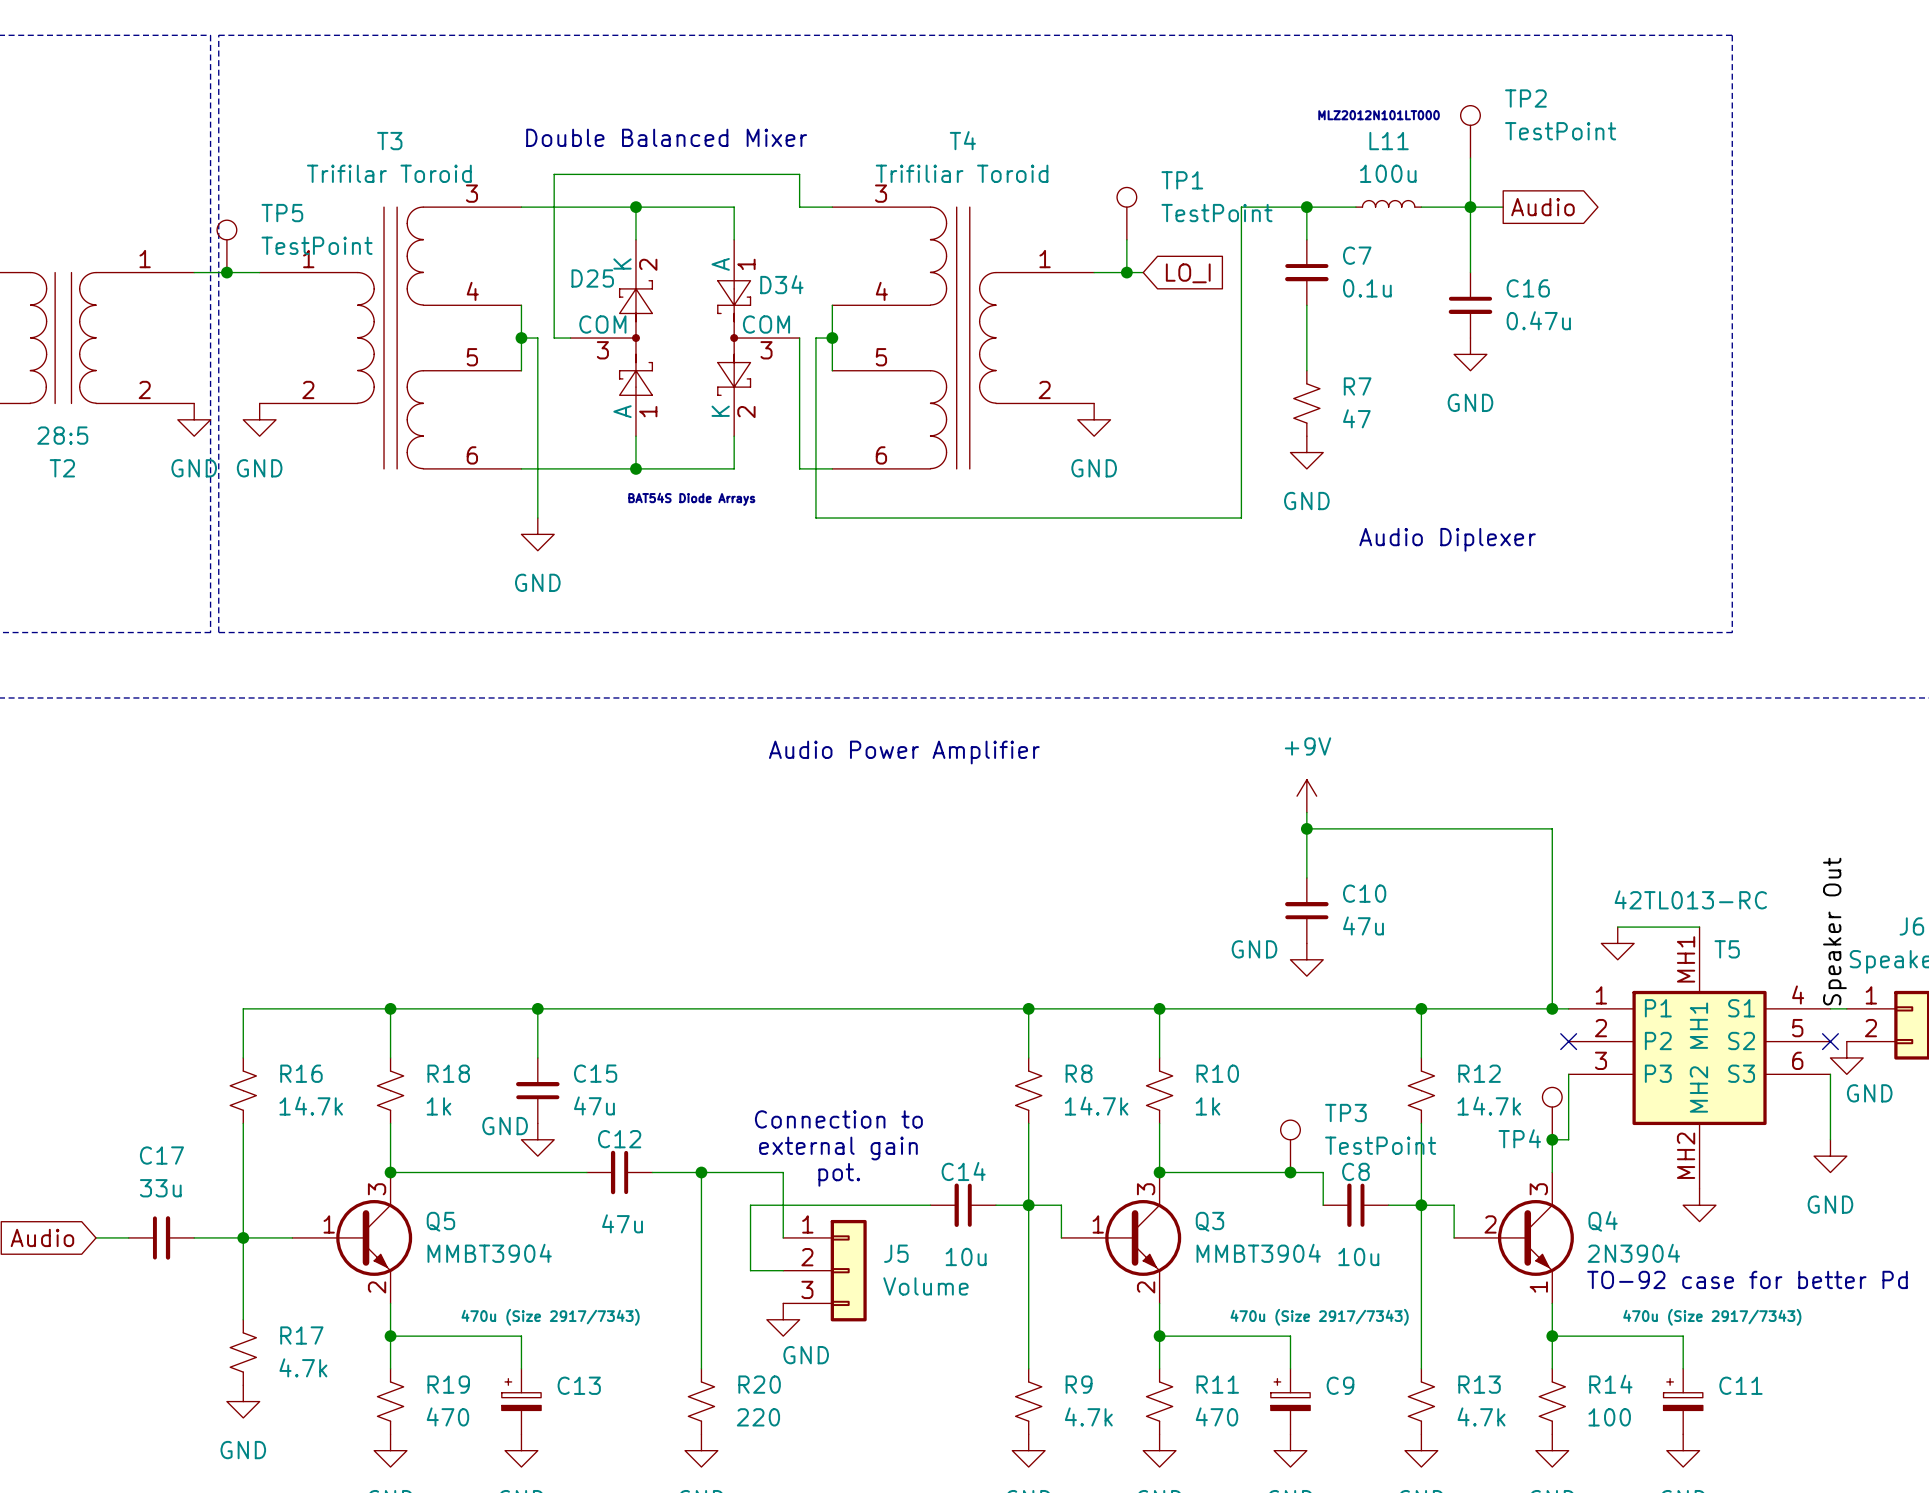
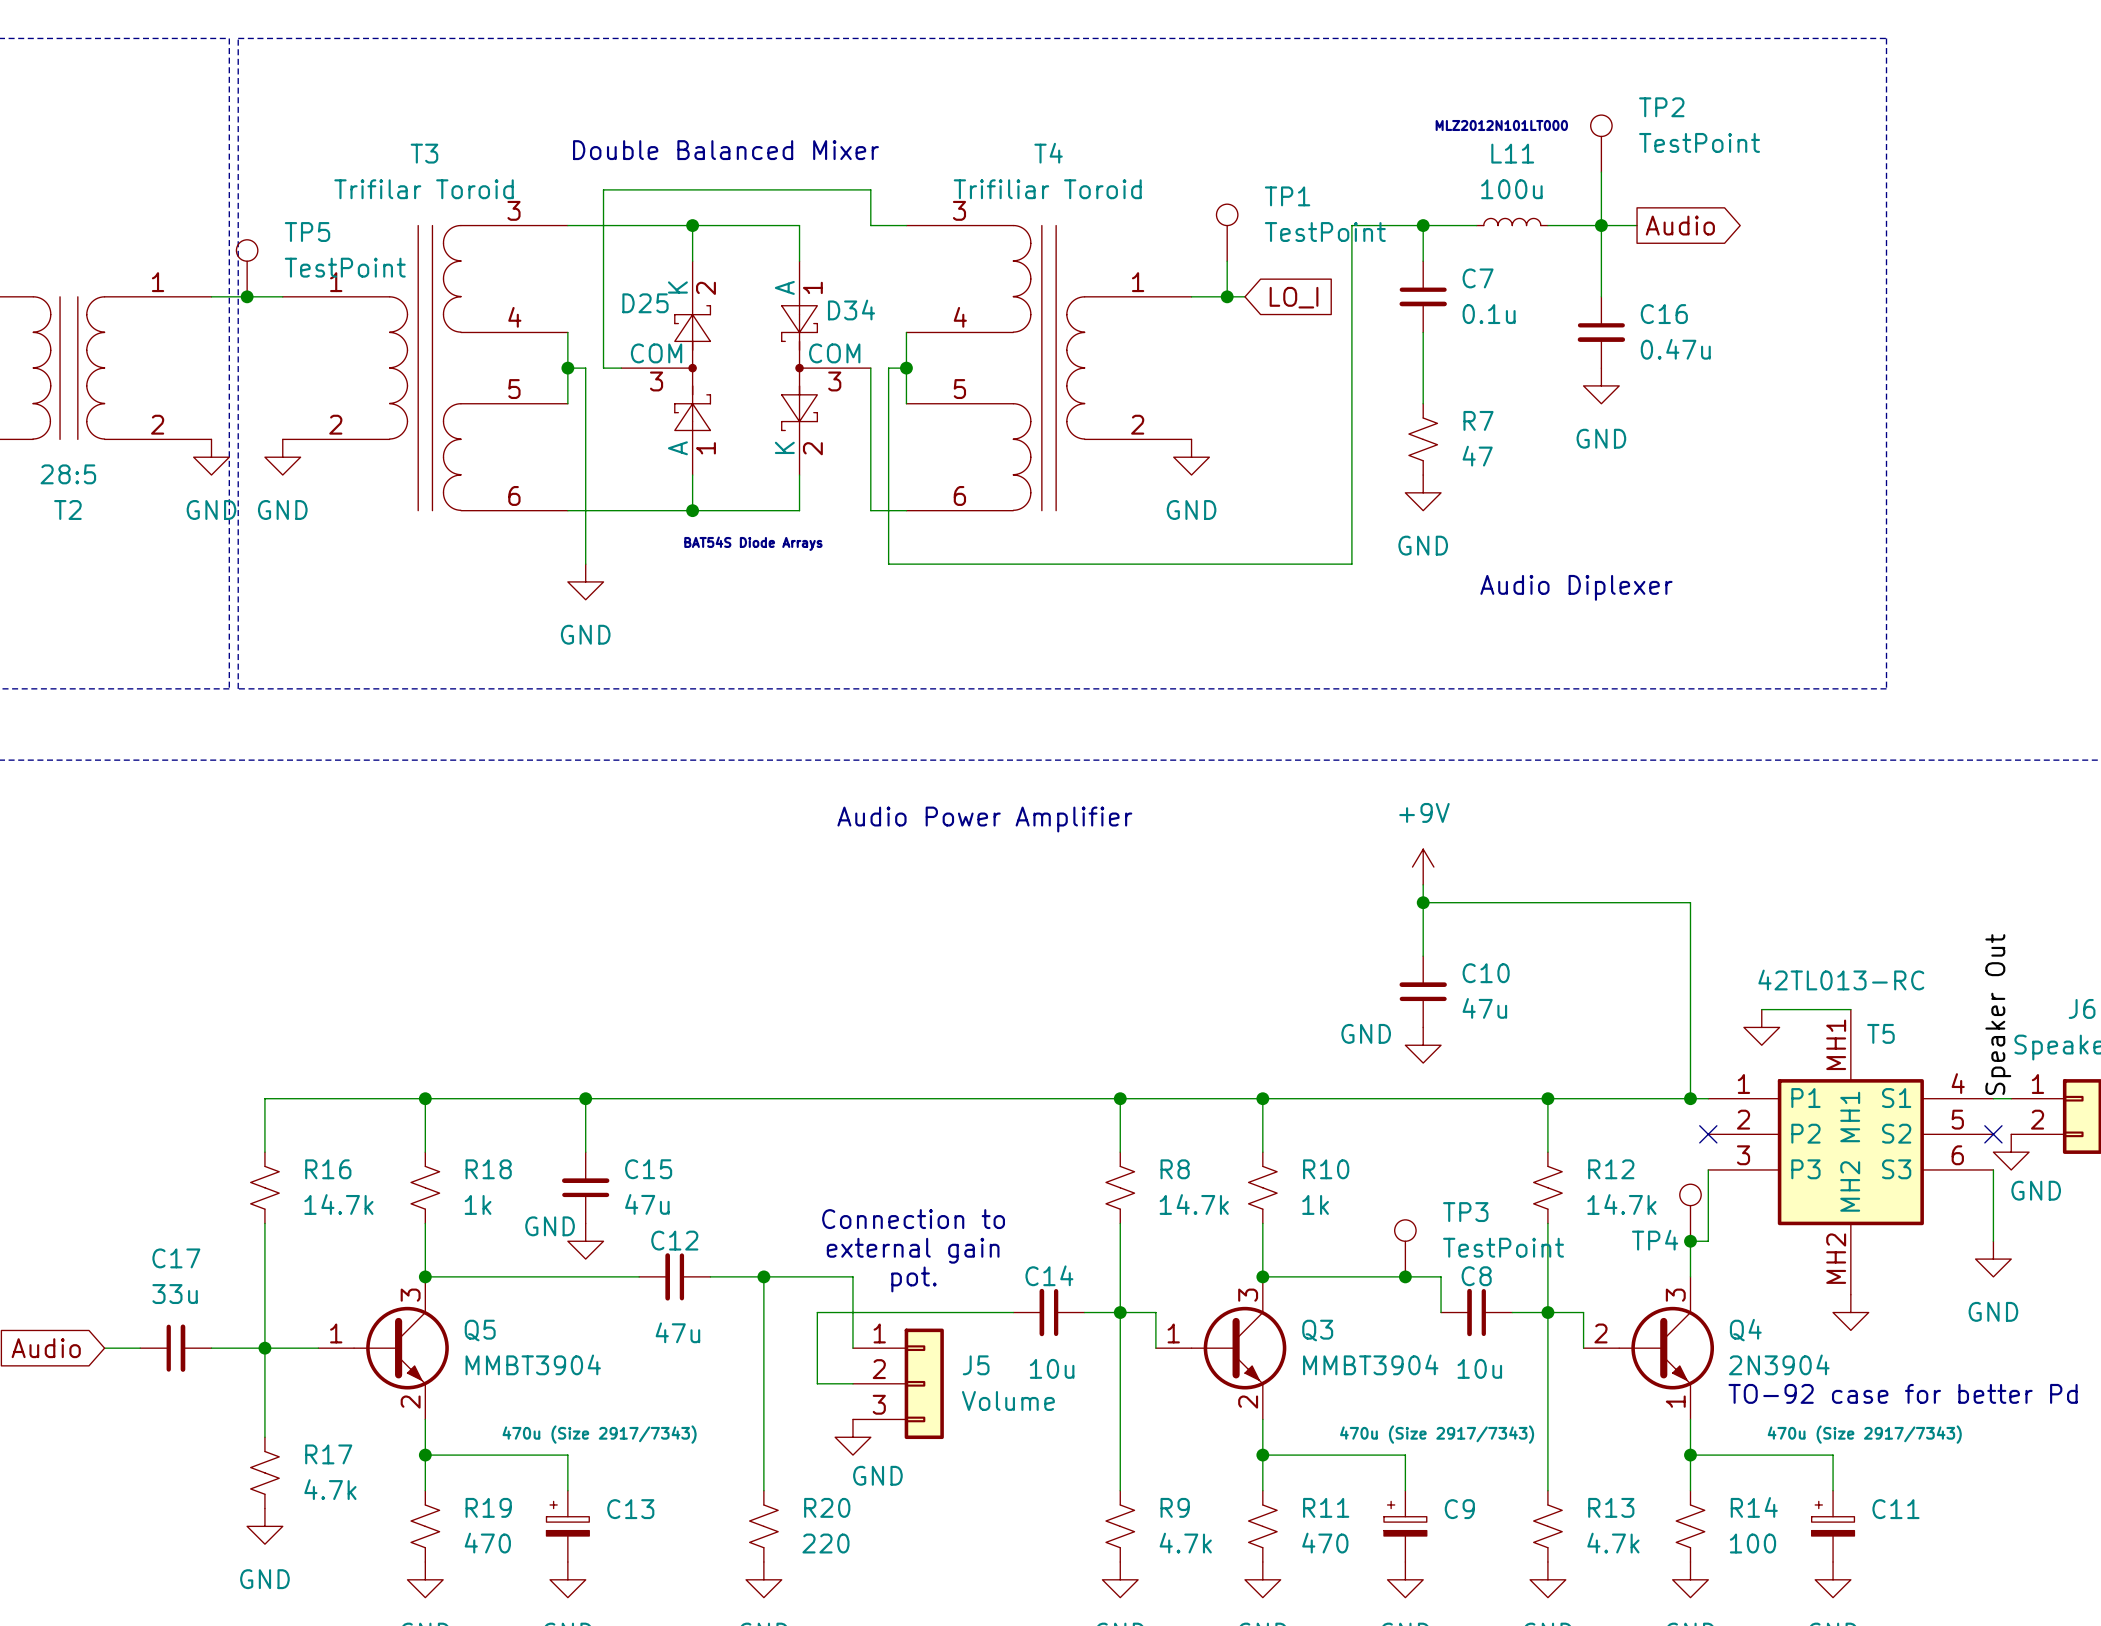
Q5 symbol: [292, 1172, 413, 1304] -> [318, 1276, 449, 1420]
Q3 symbol: [1061, 1172, 1182, 1304] -> [1155, 1276, 1287, 1420]
Q4 symbol: [1454, 1172, 1574, 1304] -> [1583, 1276, 1715, 1420]

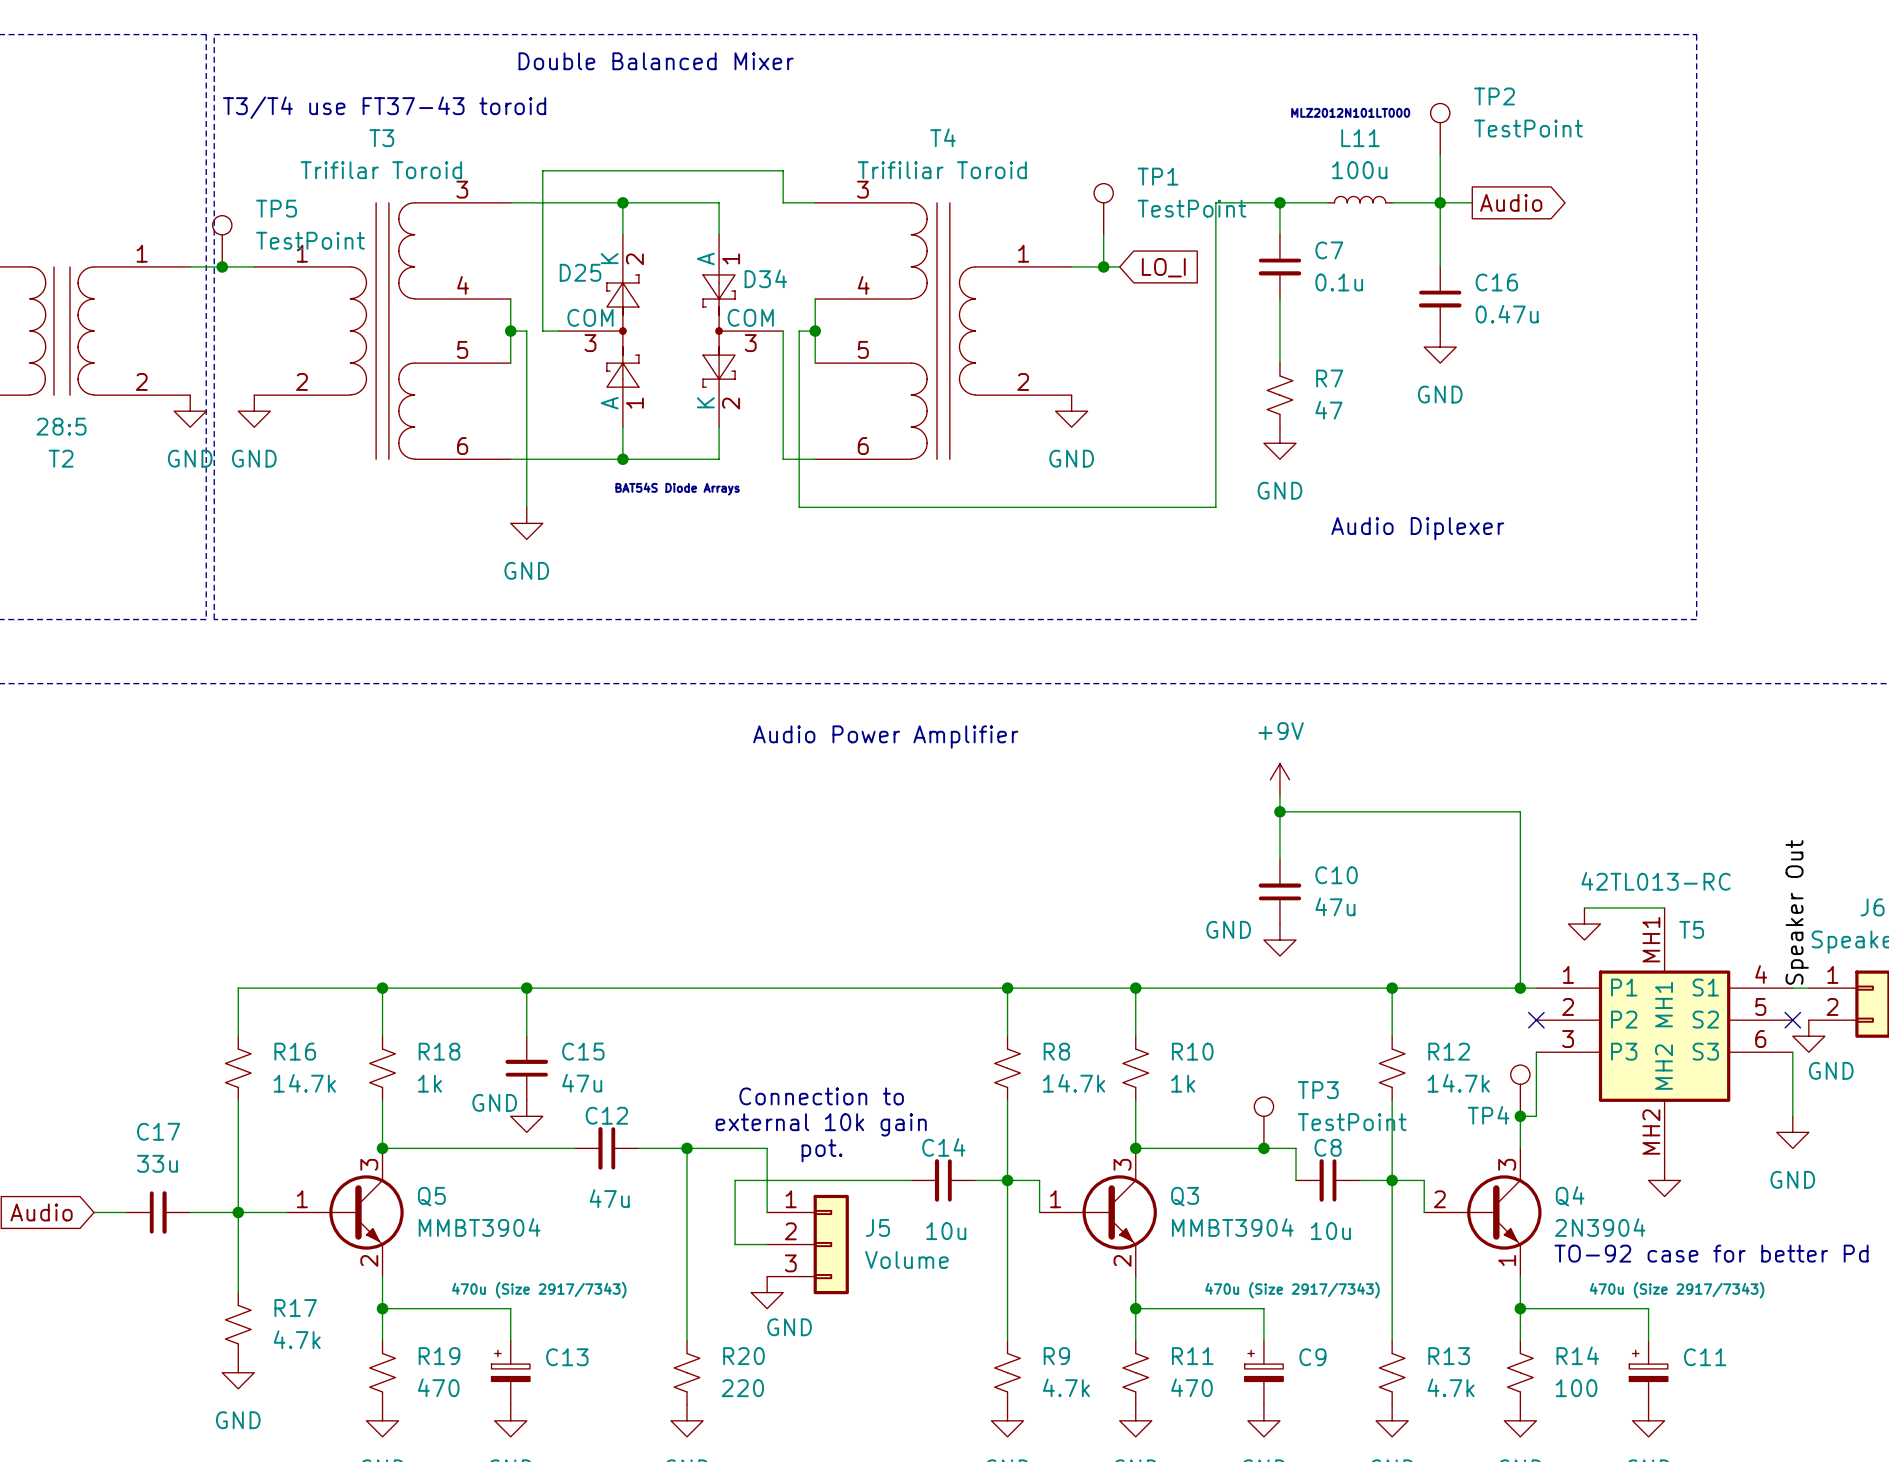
text: none -> T3/T4 use FT37-43 toroid (384, 107)
text position: Double Balanced Mixer (725, 150) -> Double Balanced Mixer (656, 61)
text: external gain (913, 1250) -> external 10k gain (821, 1124)

